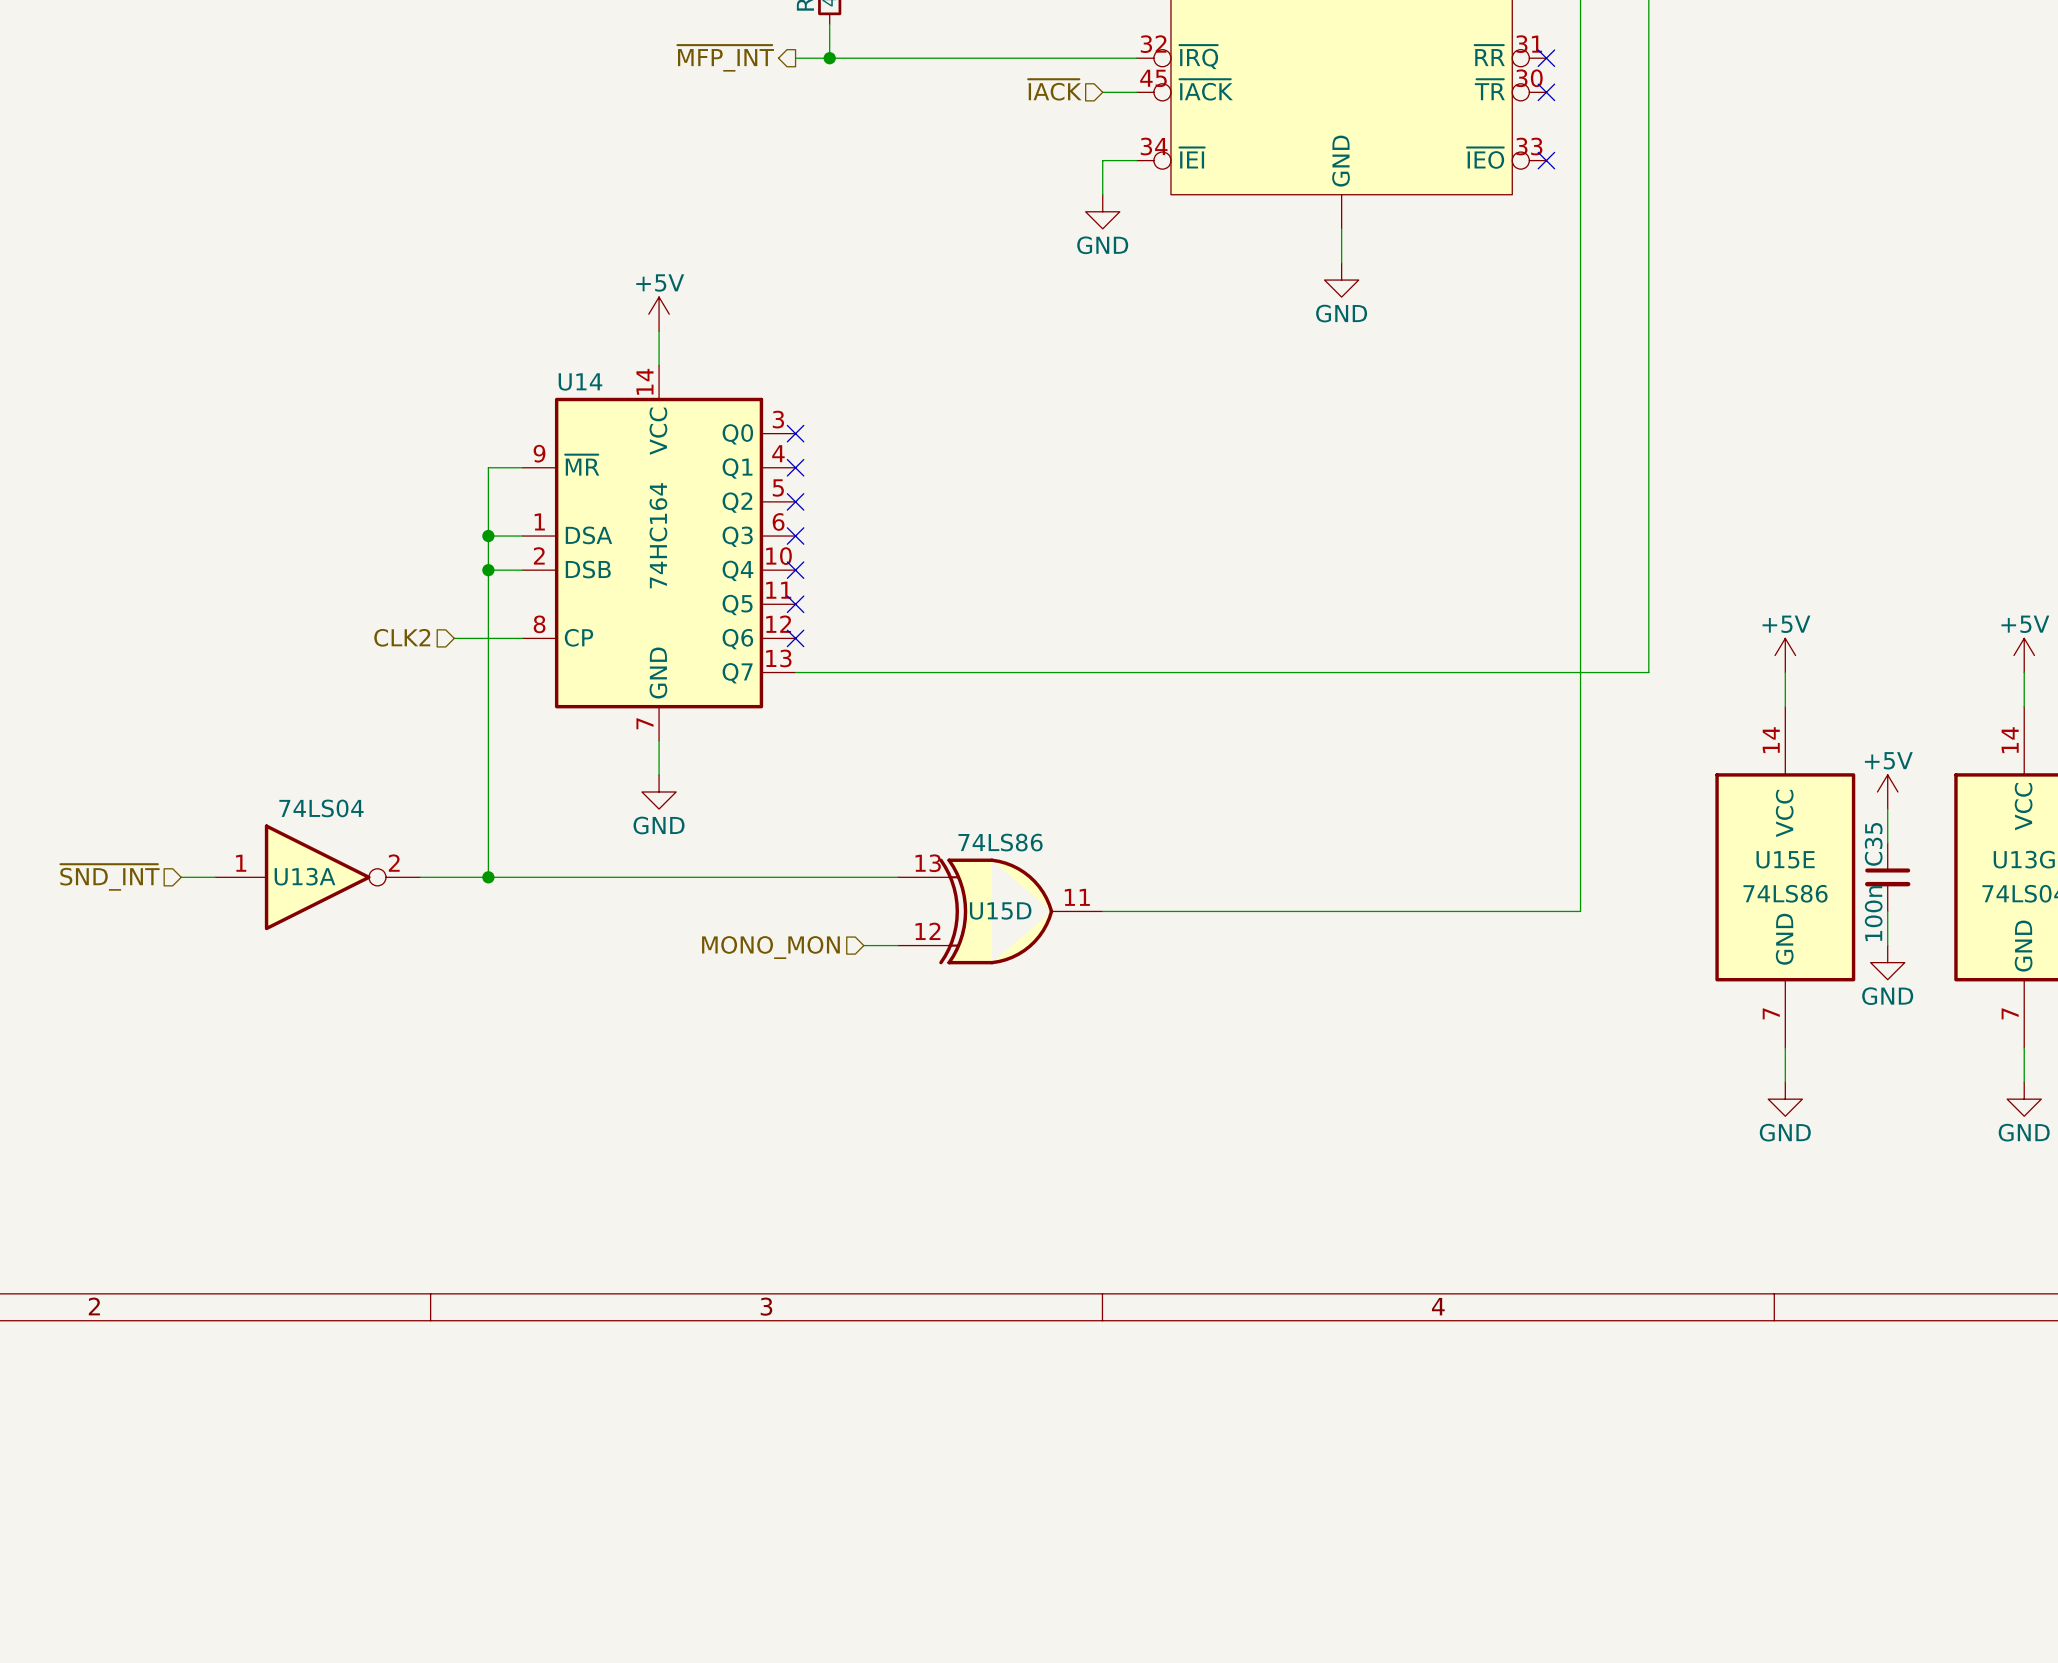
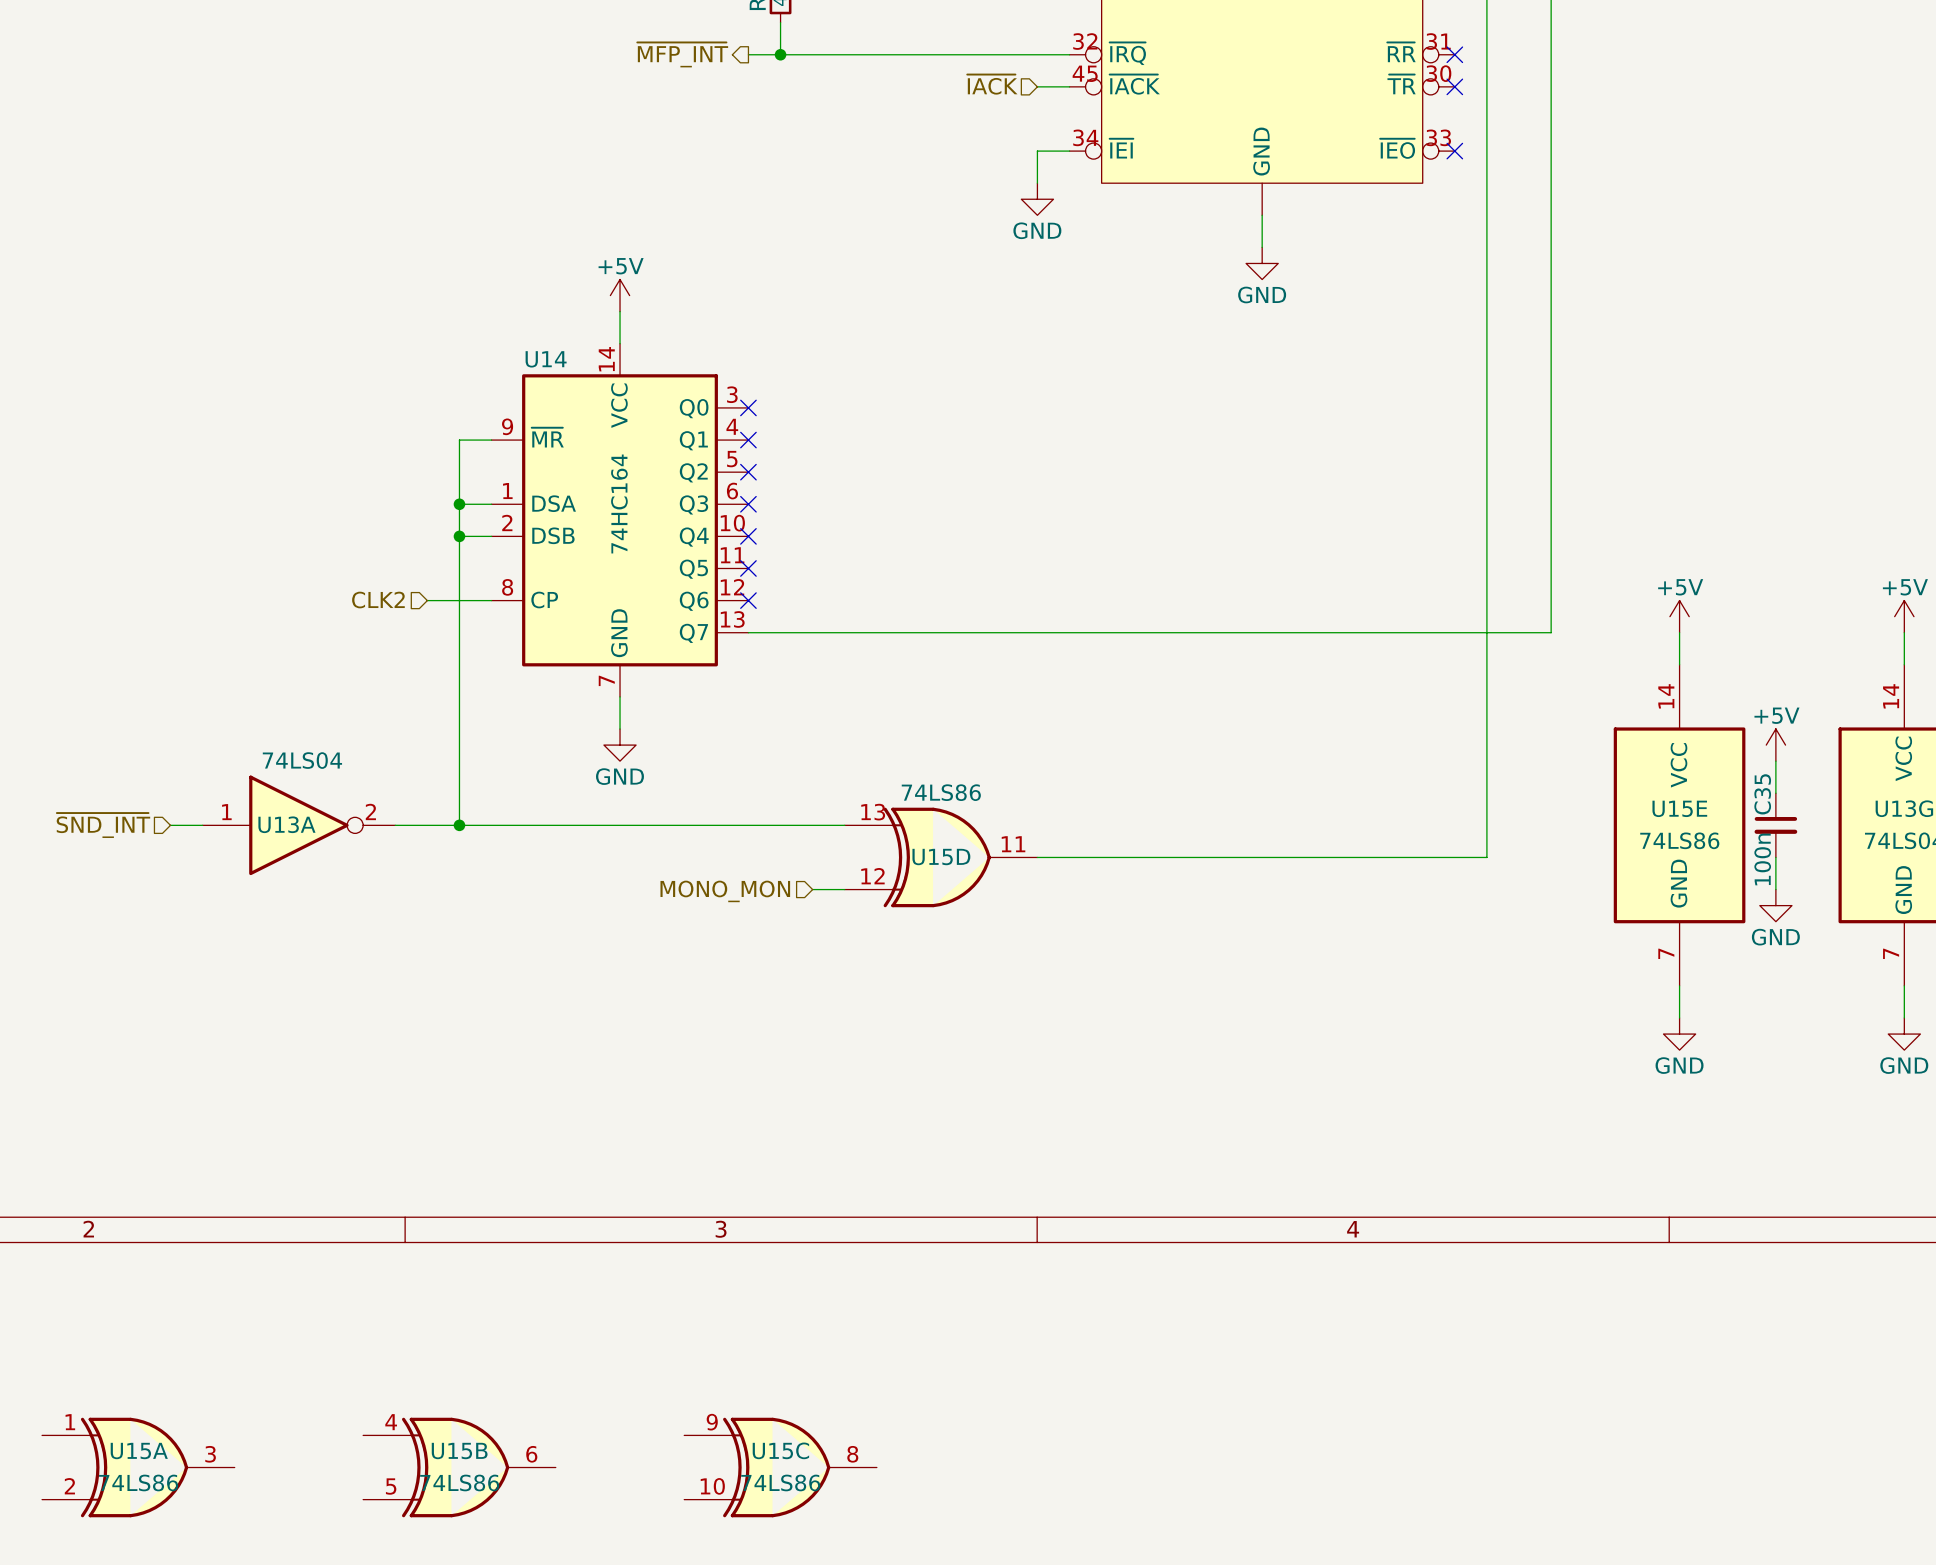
U15A: none -> 74LS86 (138, 1467)
U15B: none -> 74LS86 (459, 1467)
U15C: none -> 74LS86 (780, 1467)

